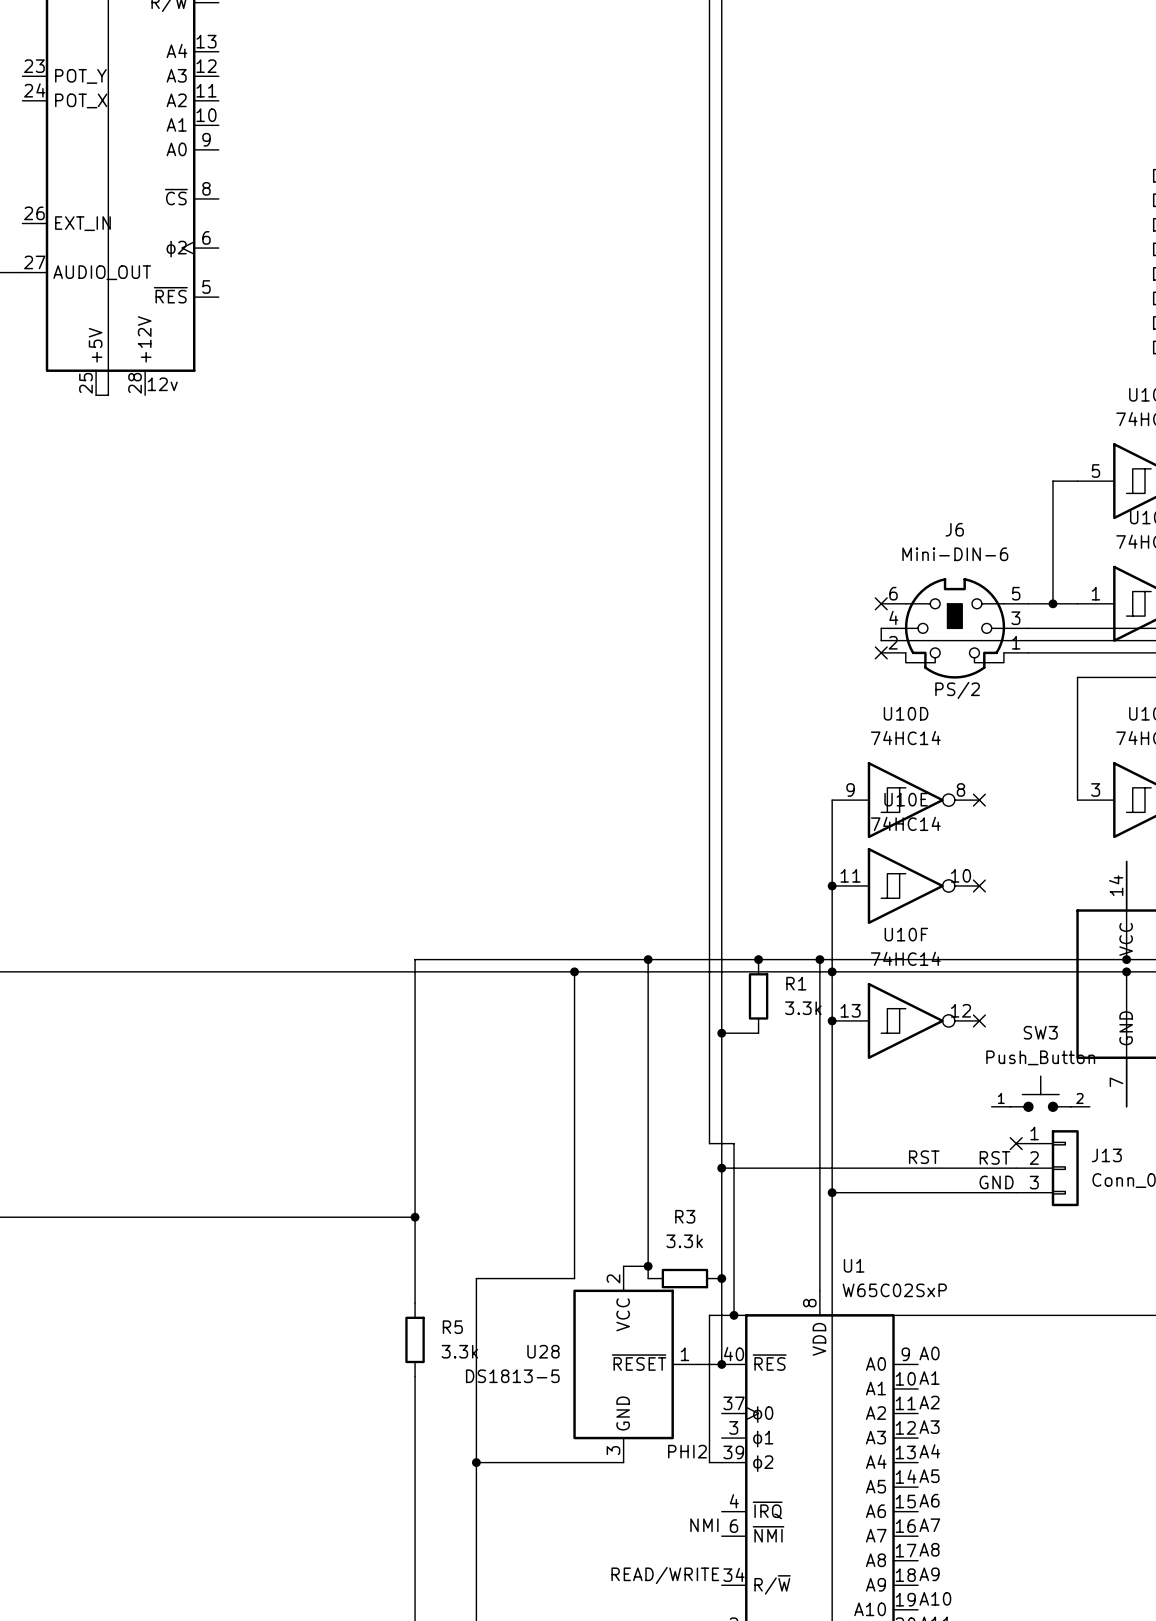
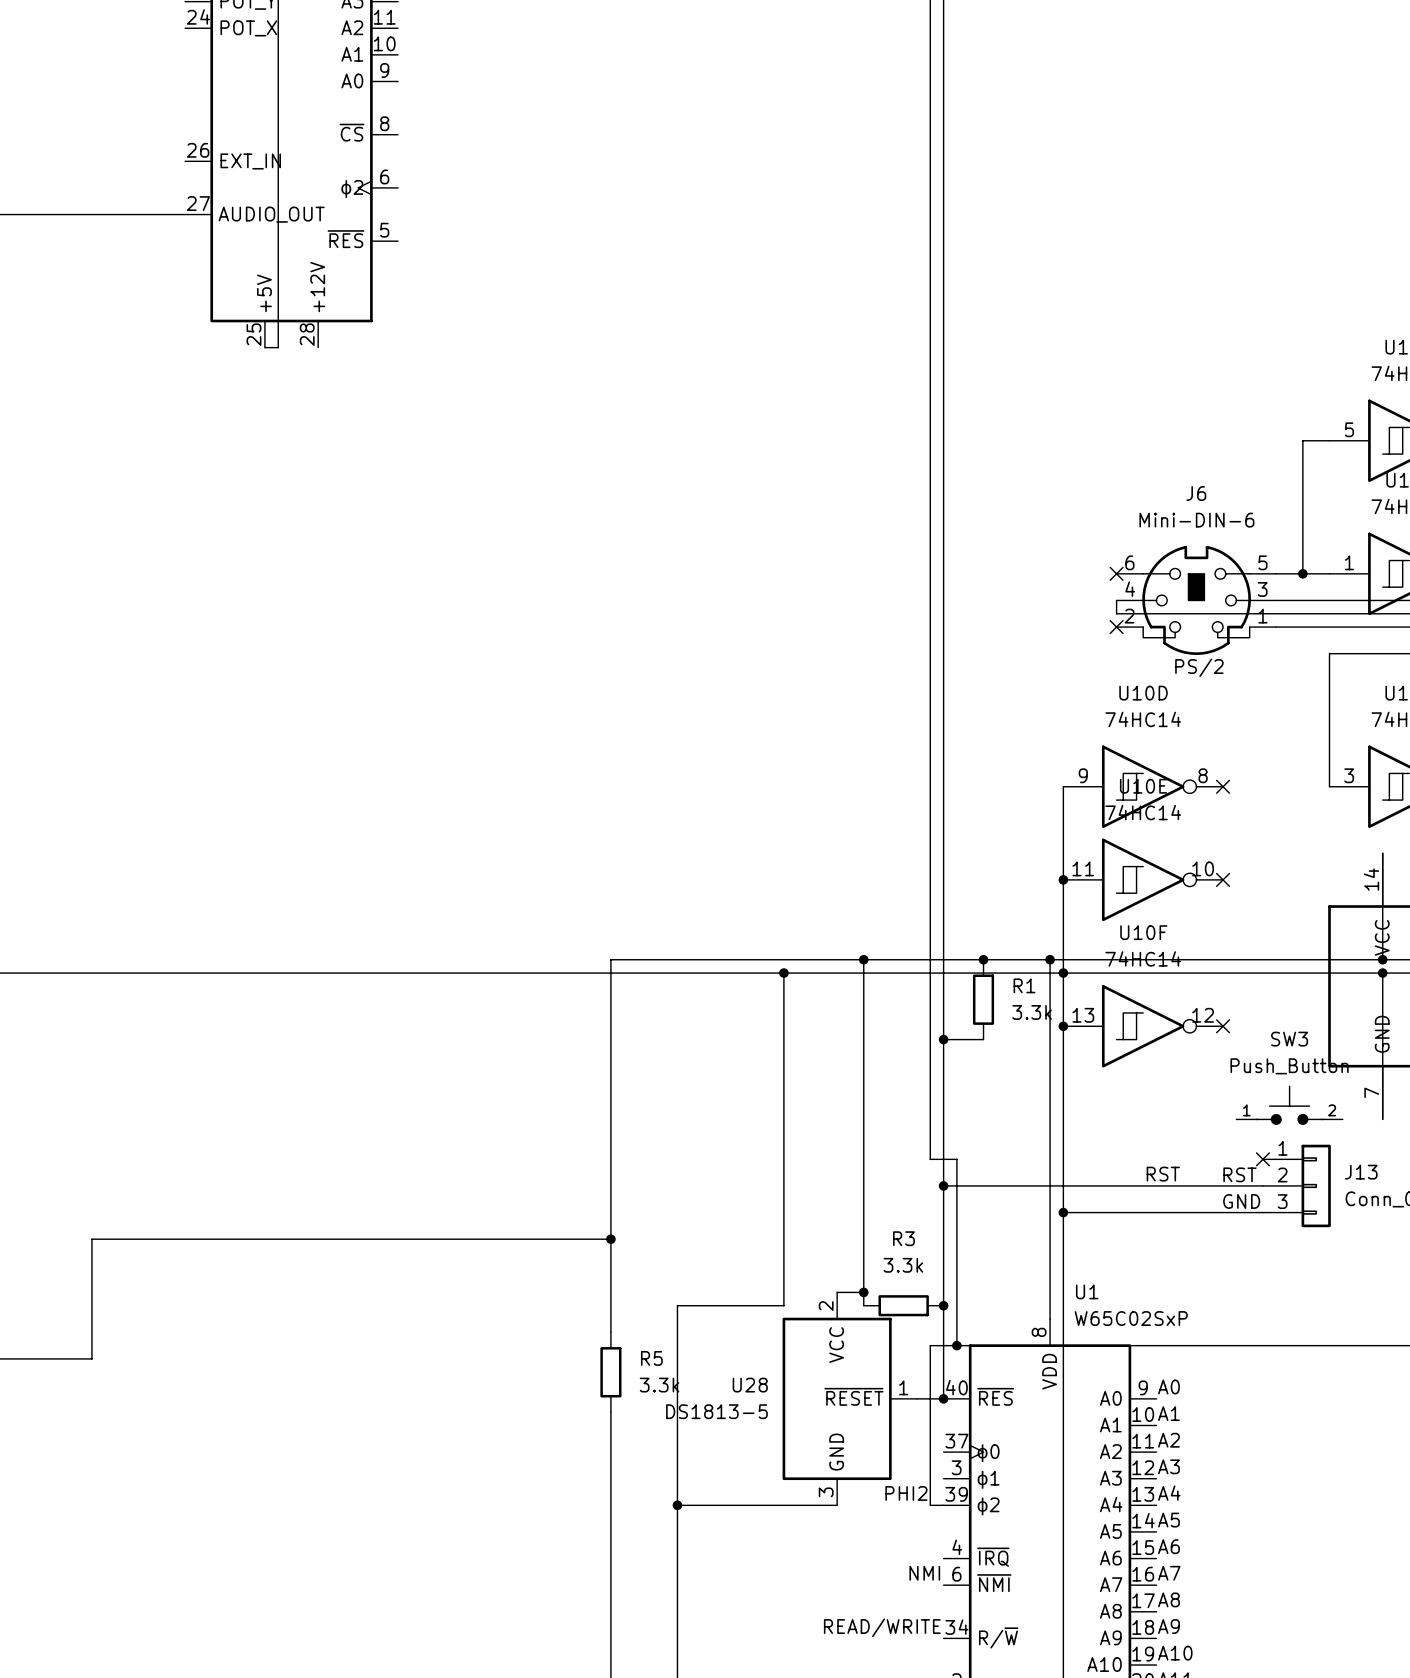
label: 12v (162, 384) -> none

